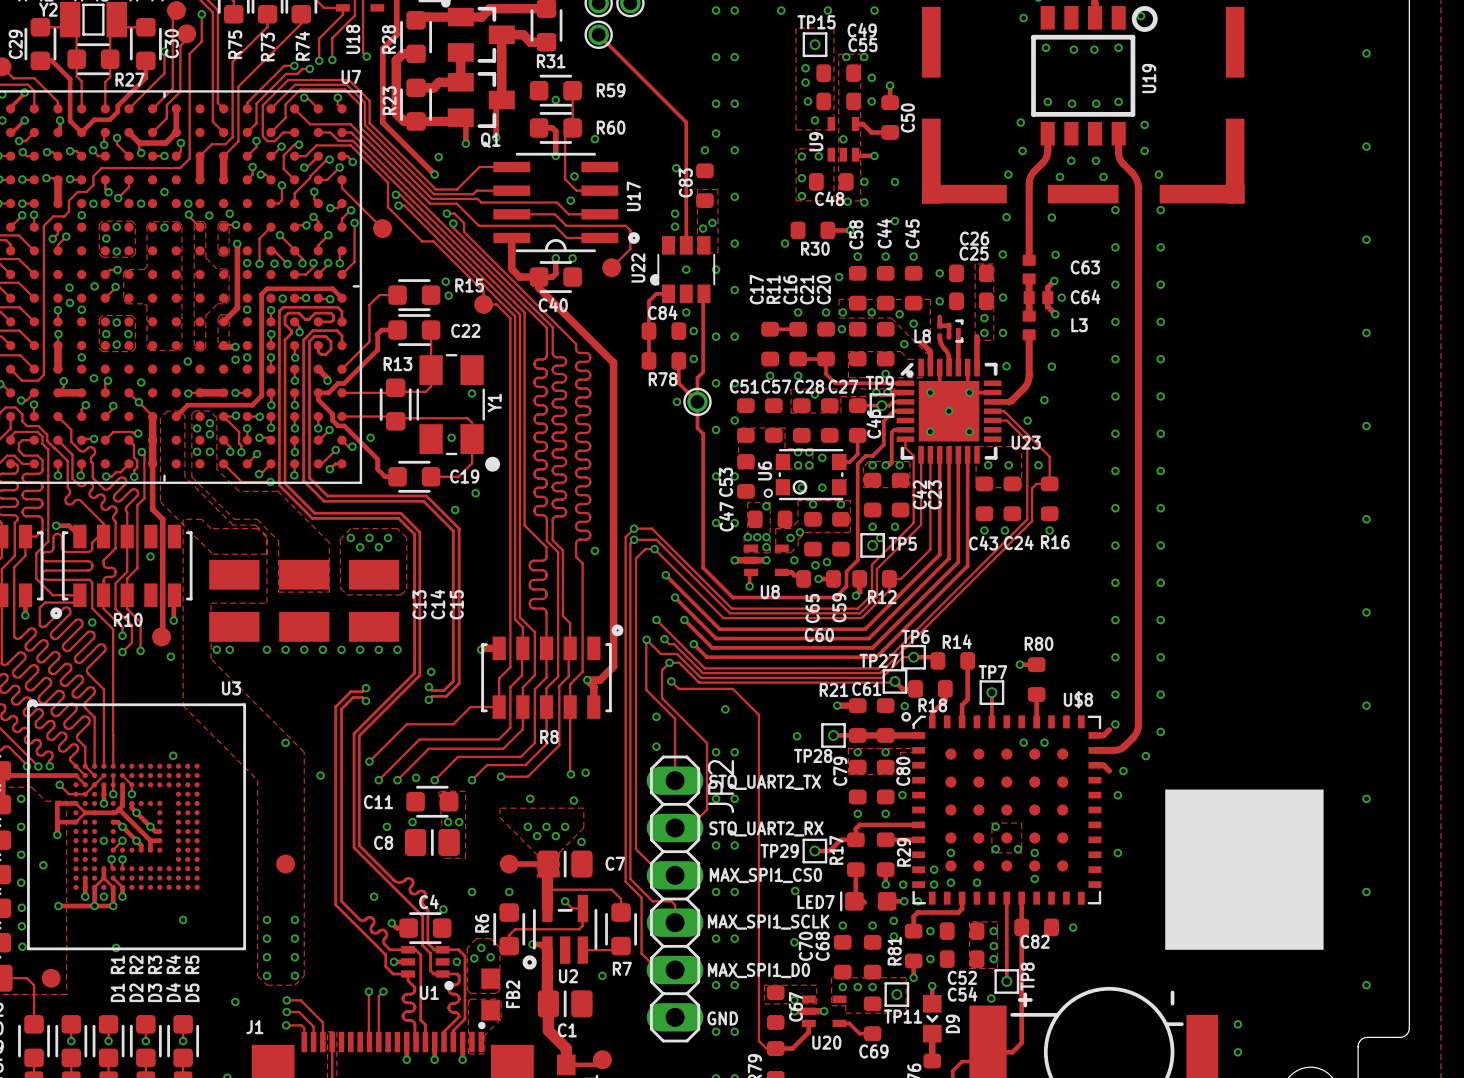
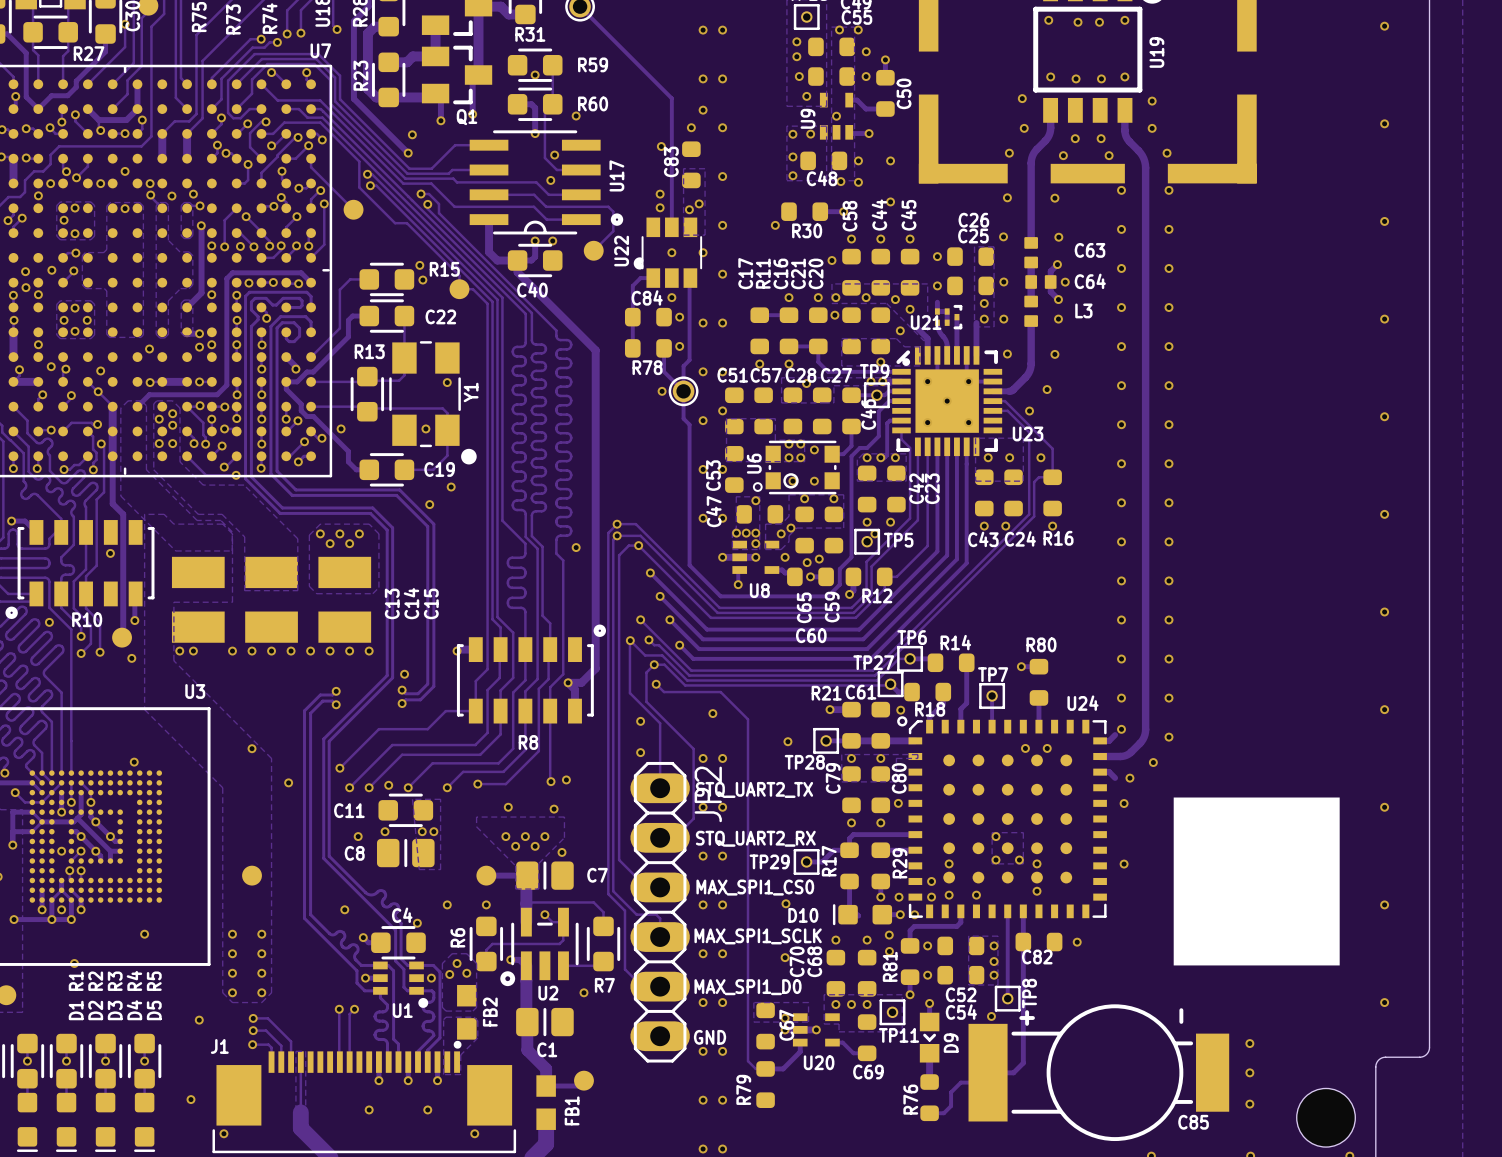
L8 name: L8 (922, 336) -> U21 (926, 322)
U$8 name: U$8 (1078, 699) -> U24 (1082, 703)
LED7 name: LED7 (816, 902) -> D10 (803, 915)

